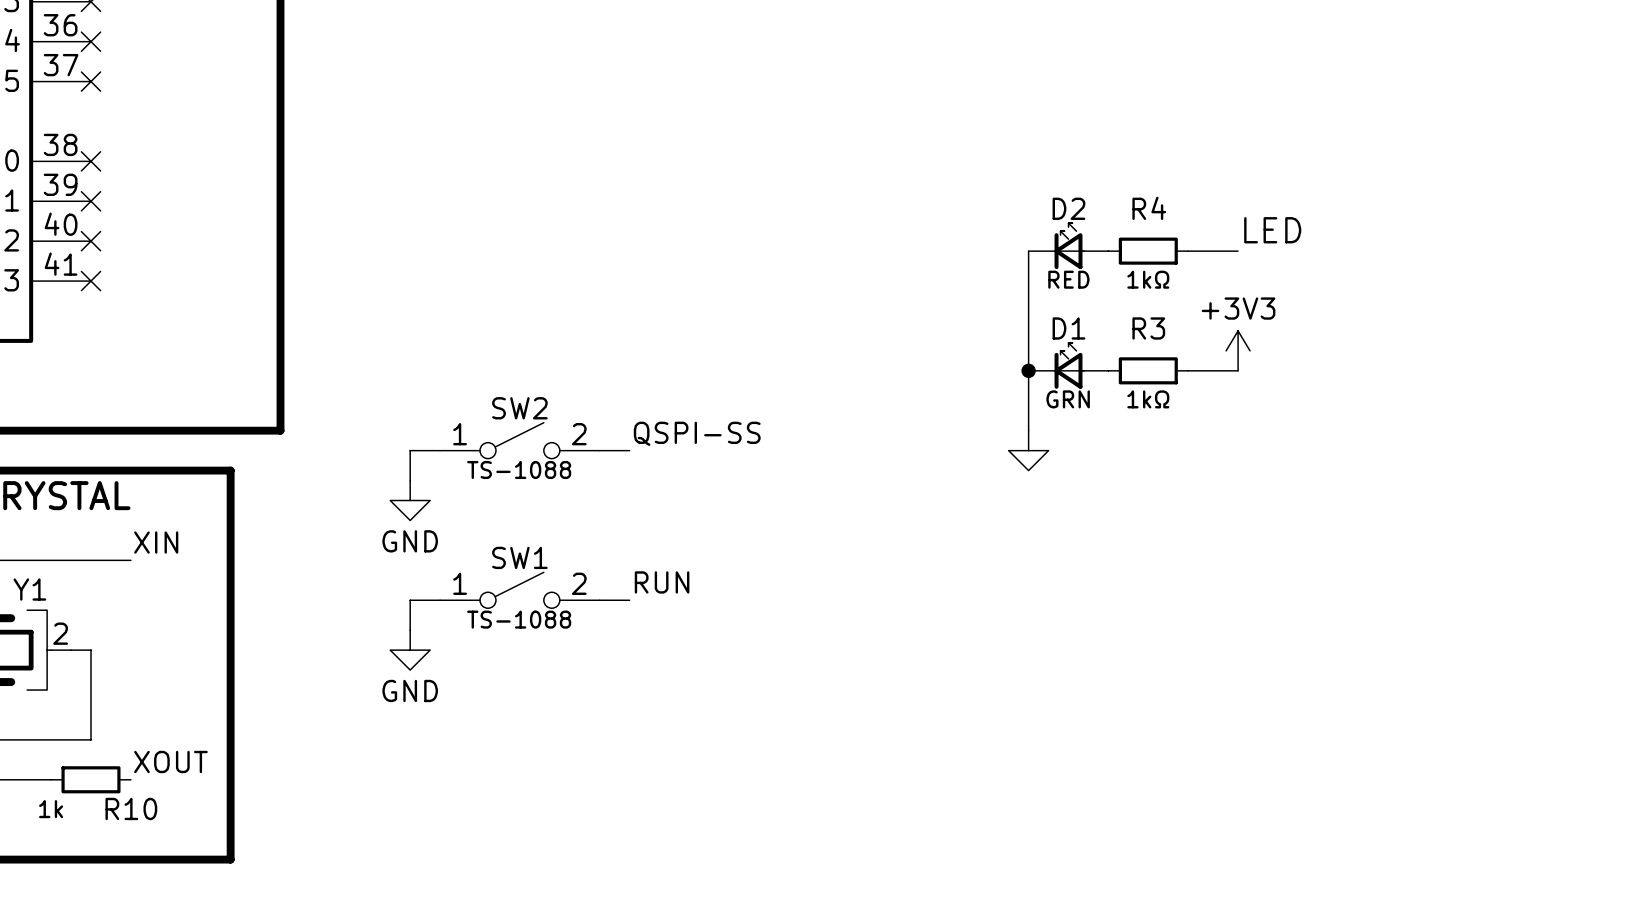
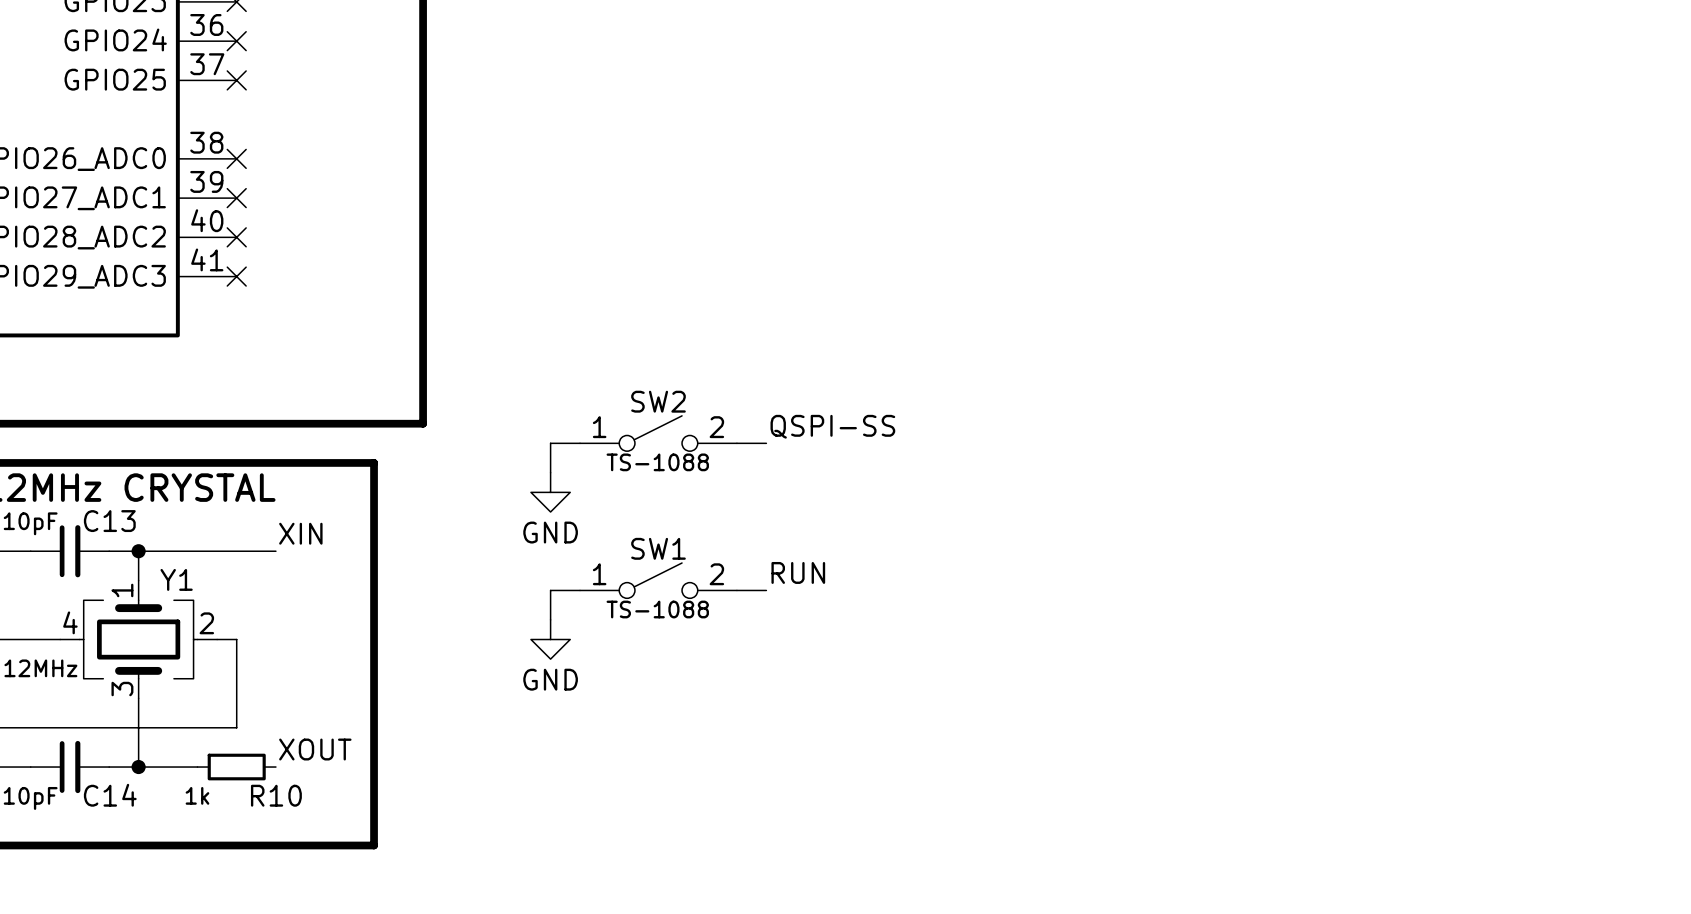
label: LED (1272, 230) -> none
D2: RED (1068, 246) -> none
wire: (1028, 251) (1028, 430) -> none
R4: 1kΩ (1148, 251) -> none
wire: (1188, 251) (1238, 251) -> none
power symbol: +3V3 (1238, 350) -> none
D1: GRN (1068, 365) -> none
junction: (1028, 370) -> none
R3: 1kΩ (1148, 370) -> none
wire: (1188, 370) (1238, 370) -> none
power symbol: (1028, 450) -> none

